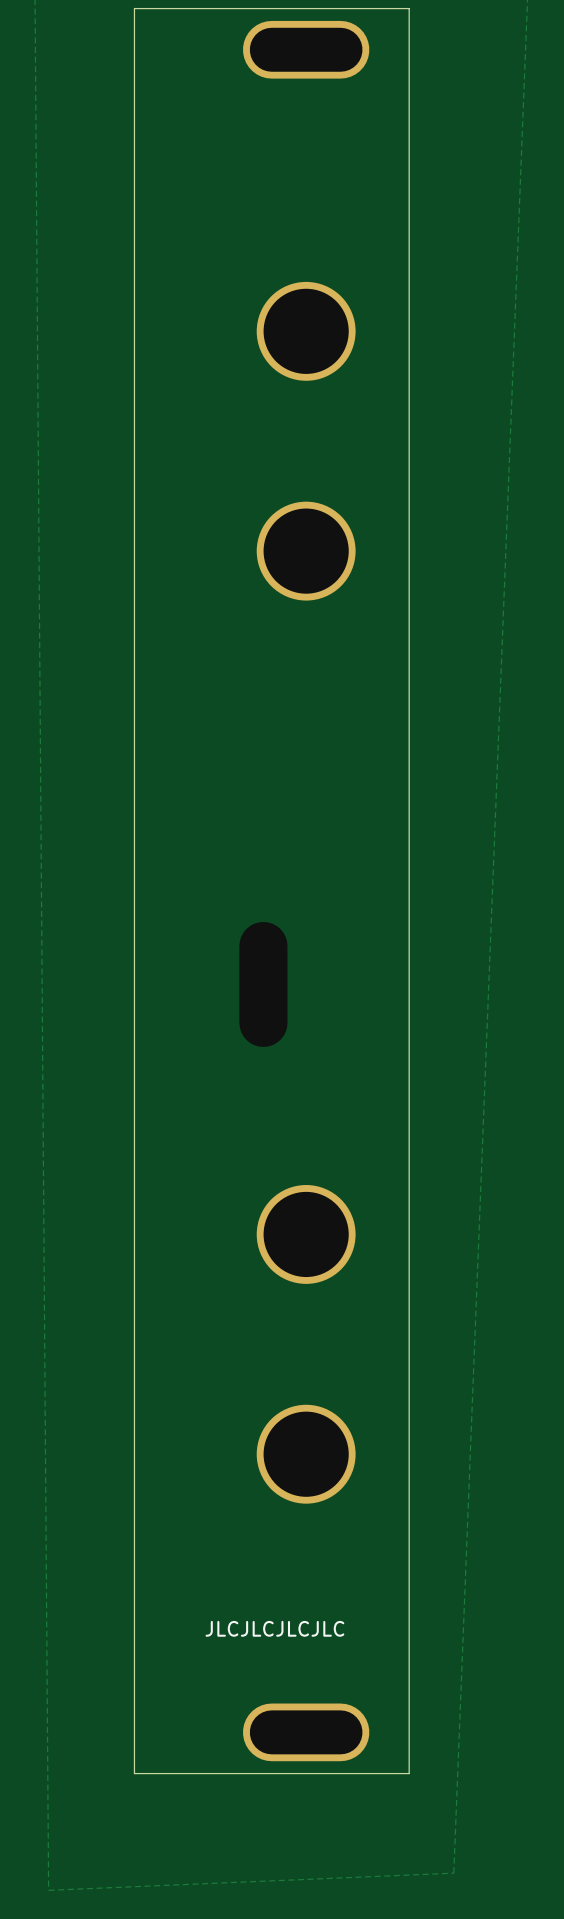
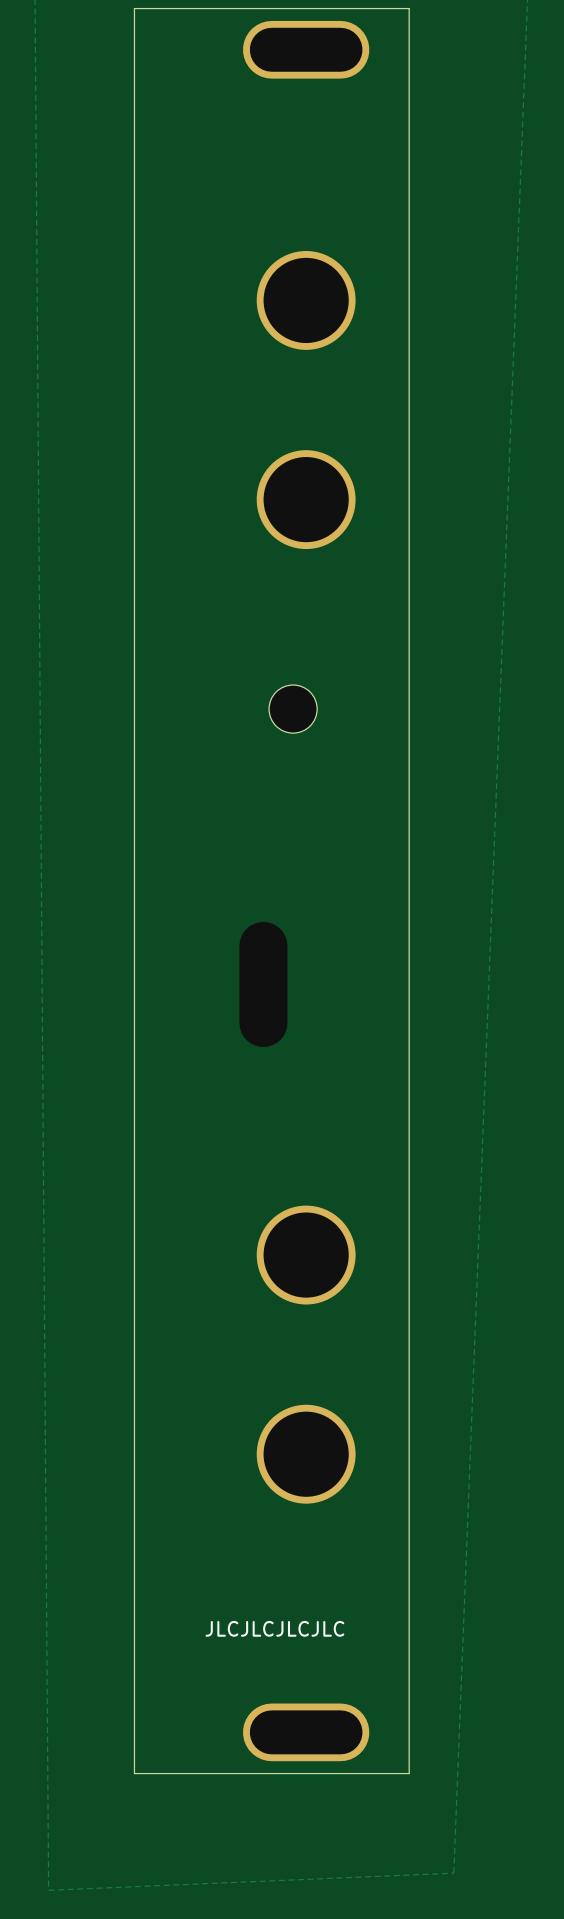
part position: (306, 331) -> (306, 300)
part position: (306, 551) -> (306, 499)
part: none -> (293, 709)
part position: (306, 1234) -> (306, 1255)

